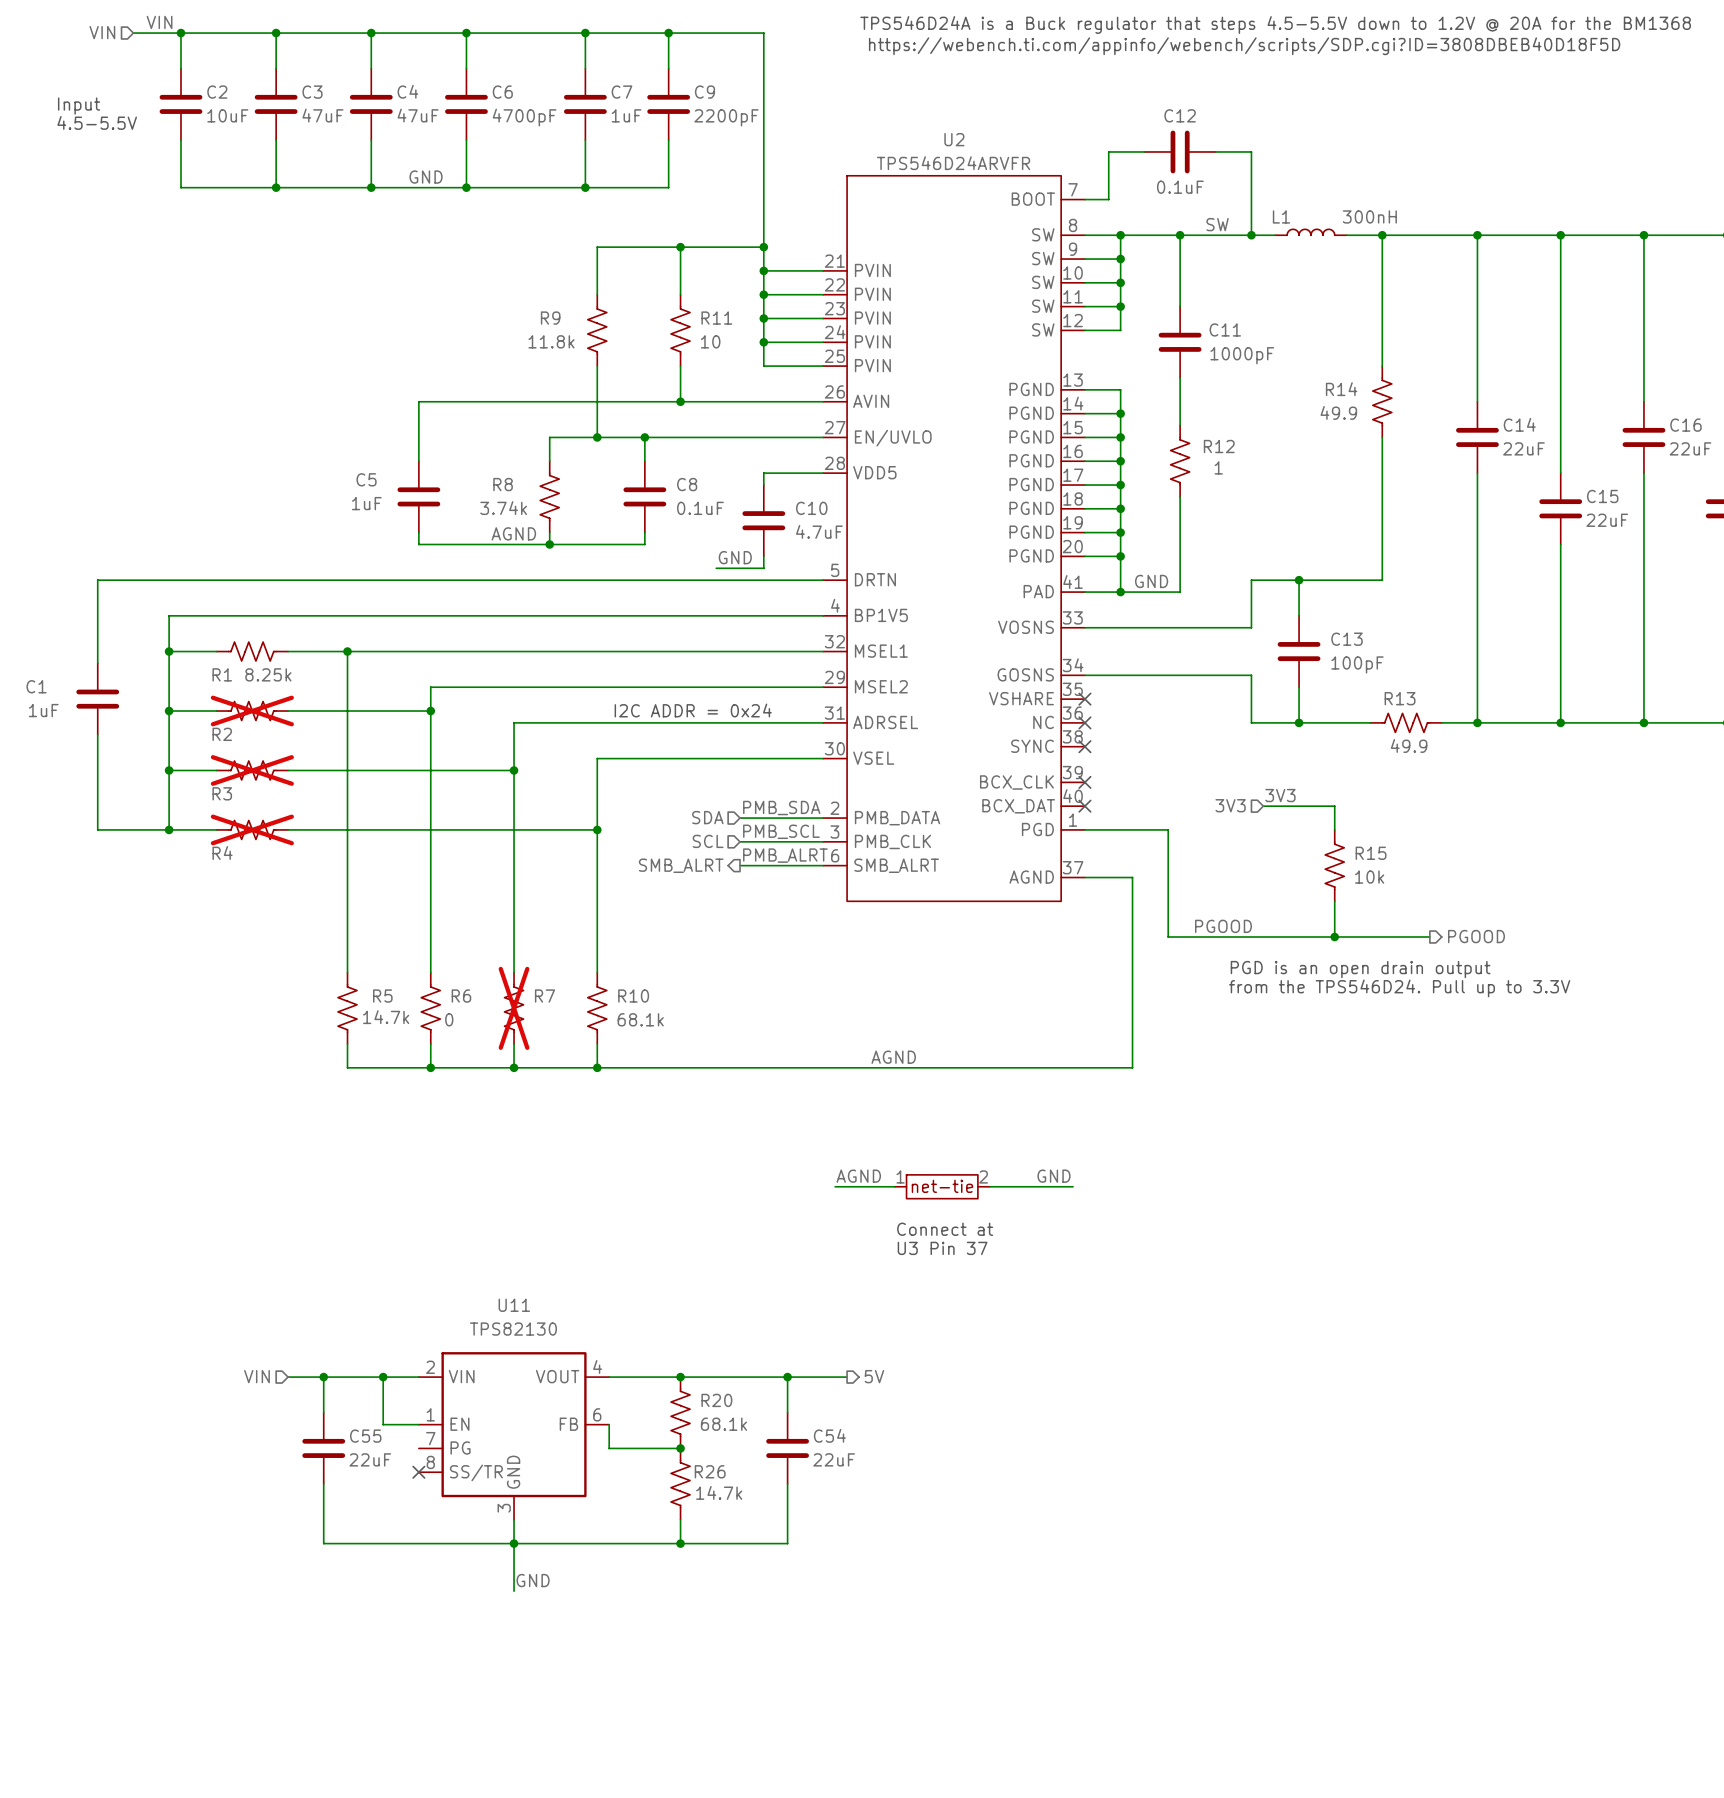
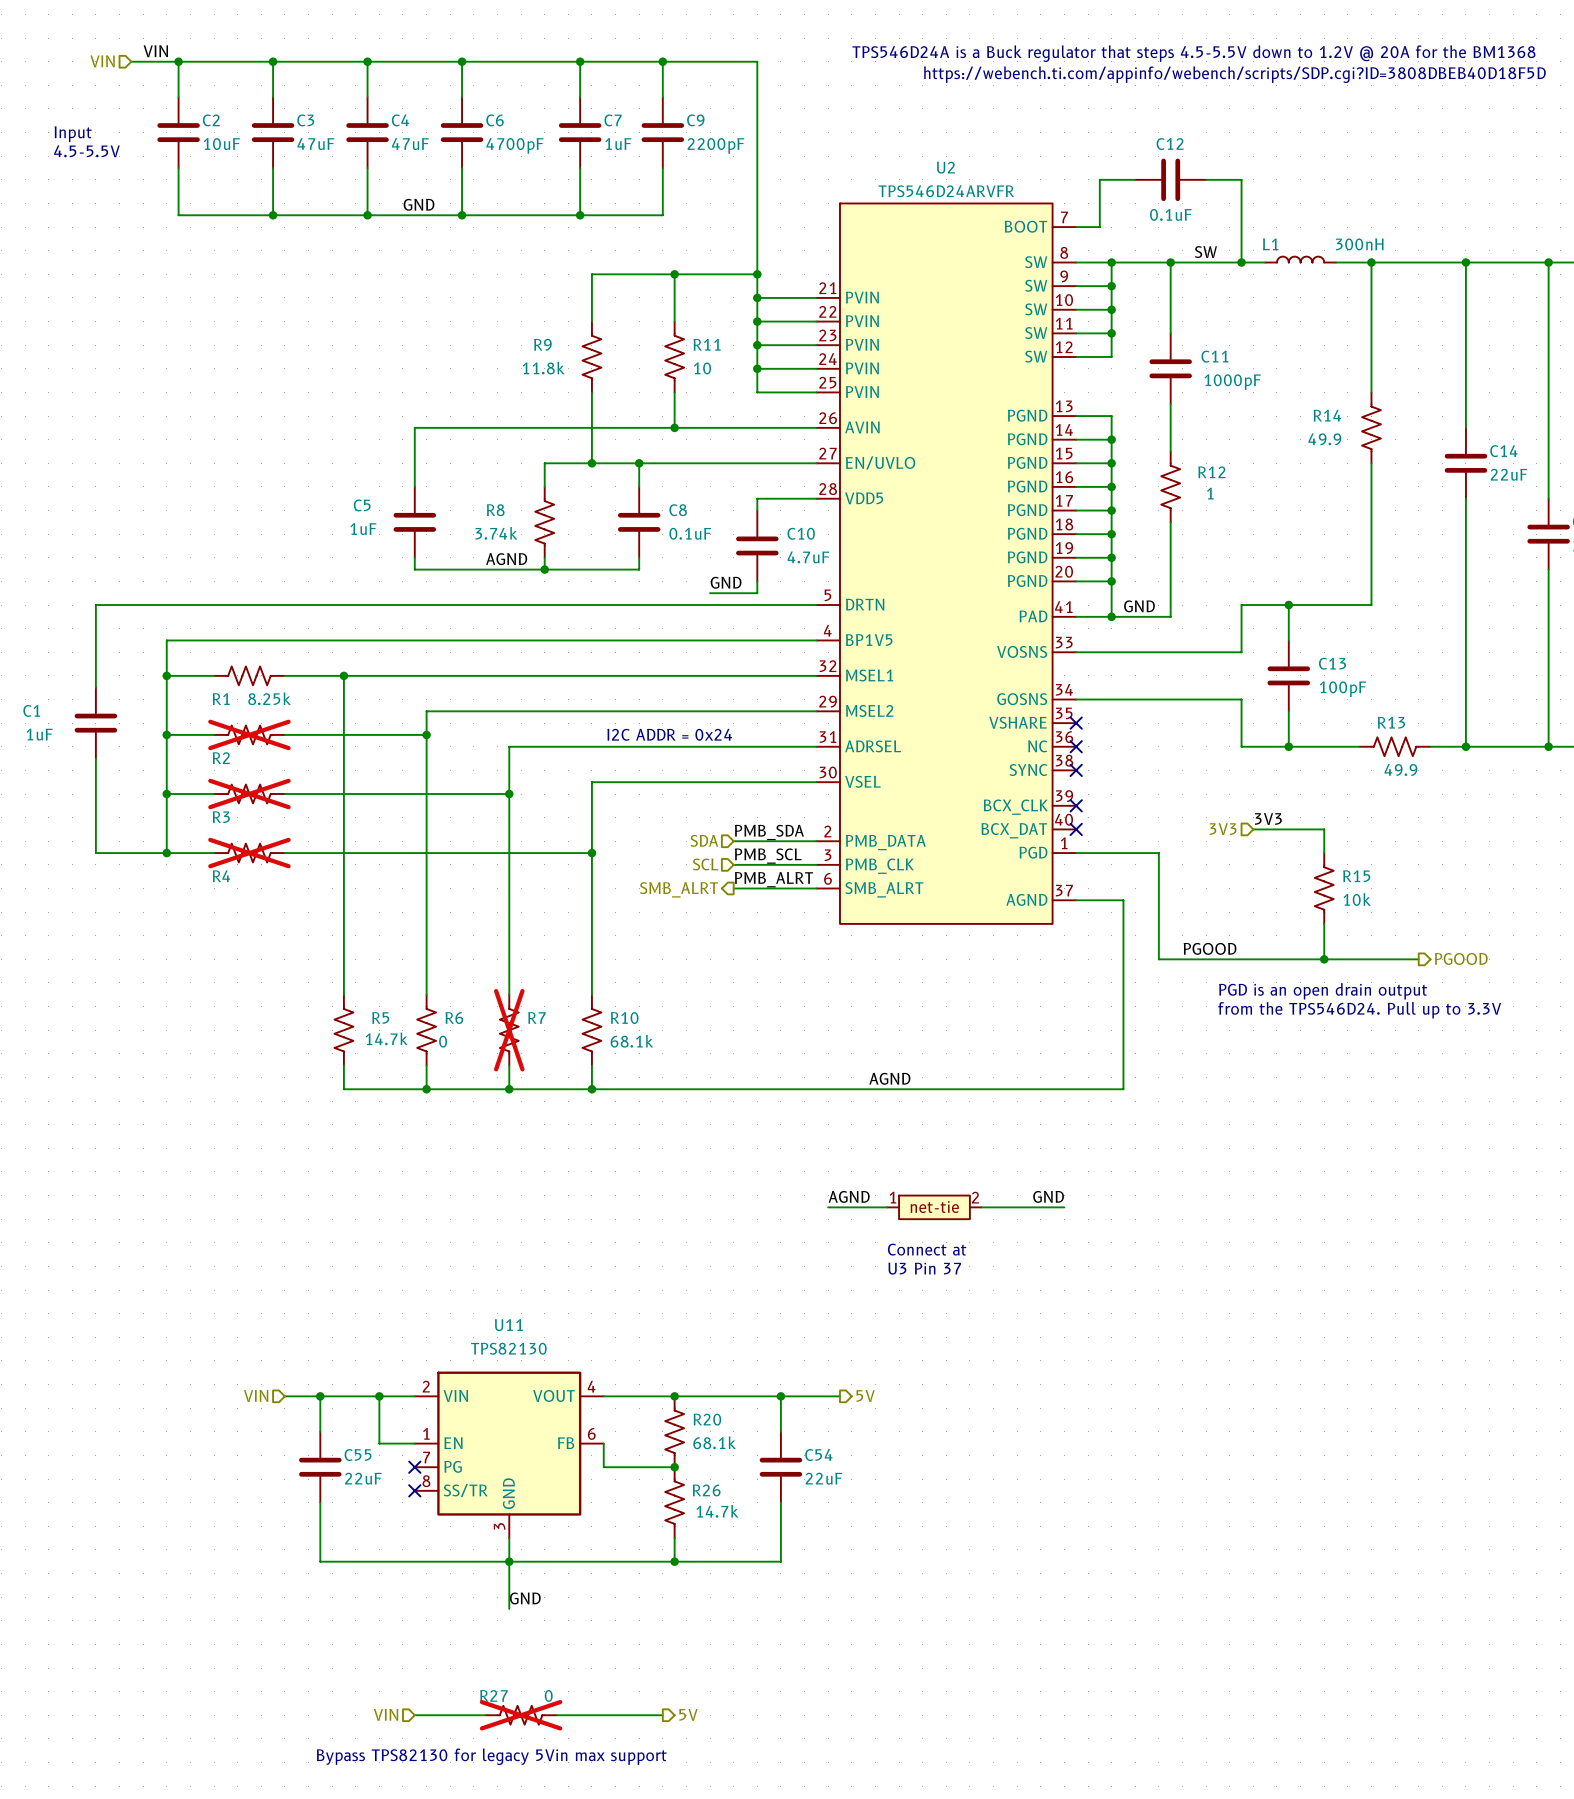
no-connect mark: none -> (414, 1467)
hierarchical label: none -> VIN (386, 1714)
hierarchical label: none -> 5V (688, 1714)
wire: none -> (414, 1715) (485, 1715)
R27: none -> 0 (521, 1715)
wire: none -> (556, 1715) (662, 1715)
text: none -> Bypass TPS82130 for legacy 5Vin max support (491, 1756)

